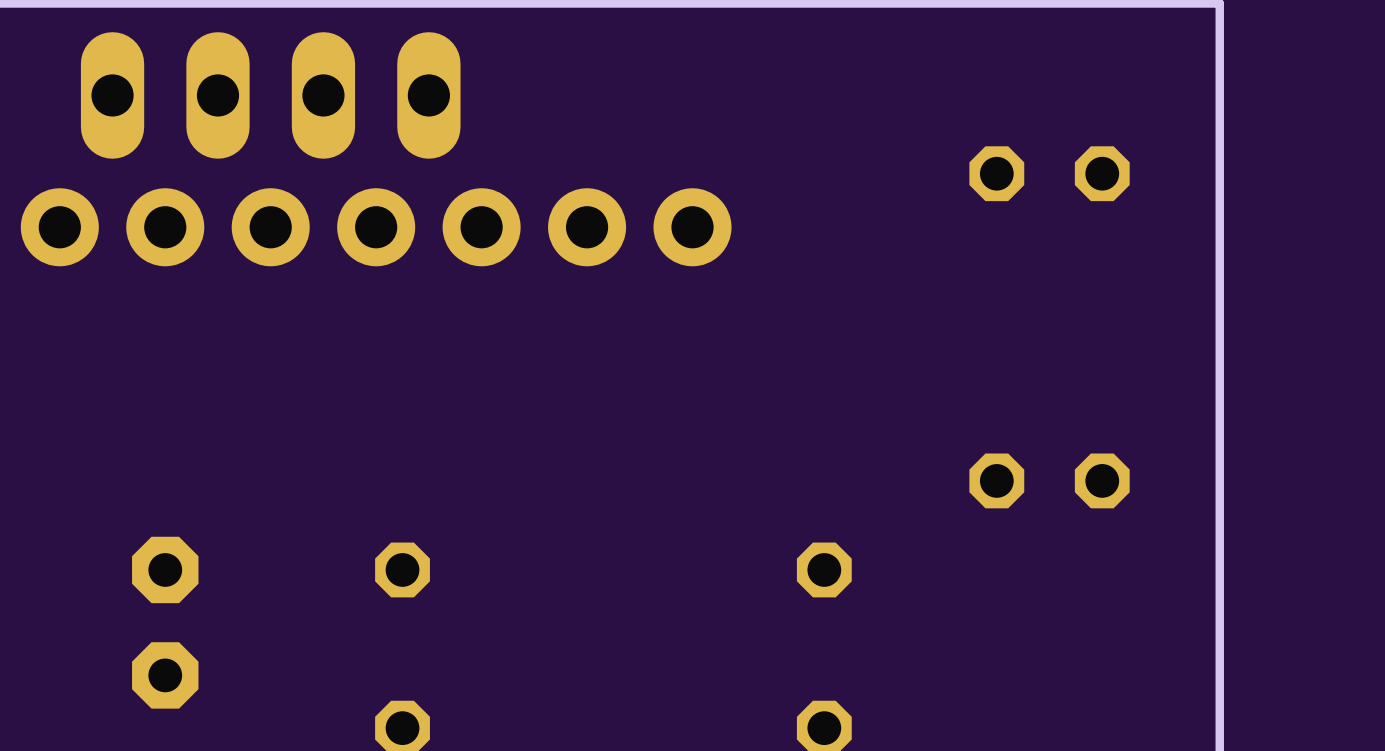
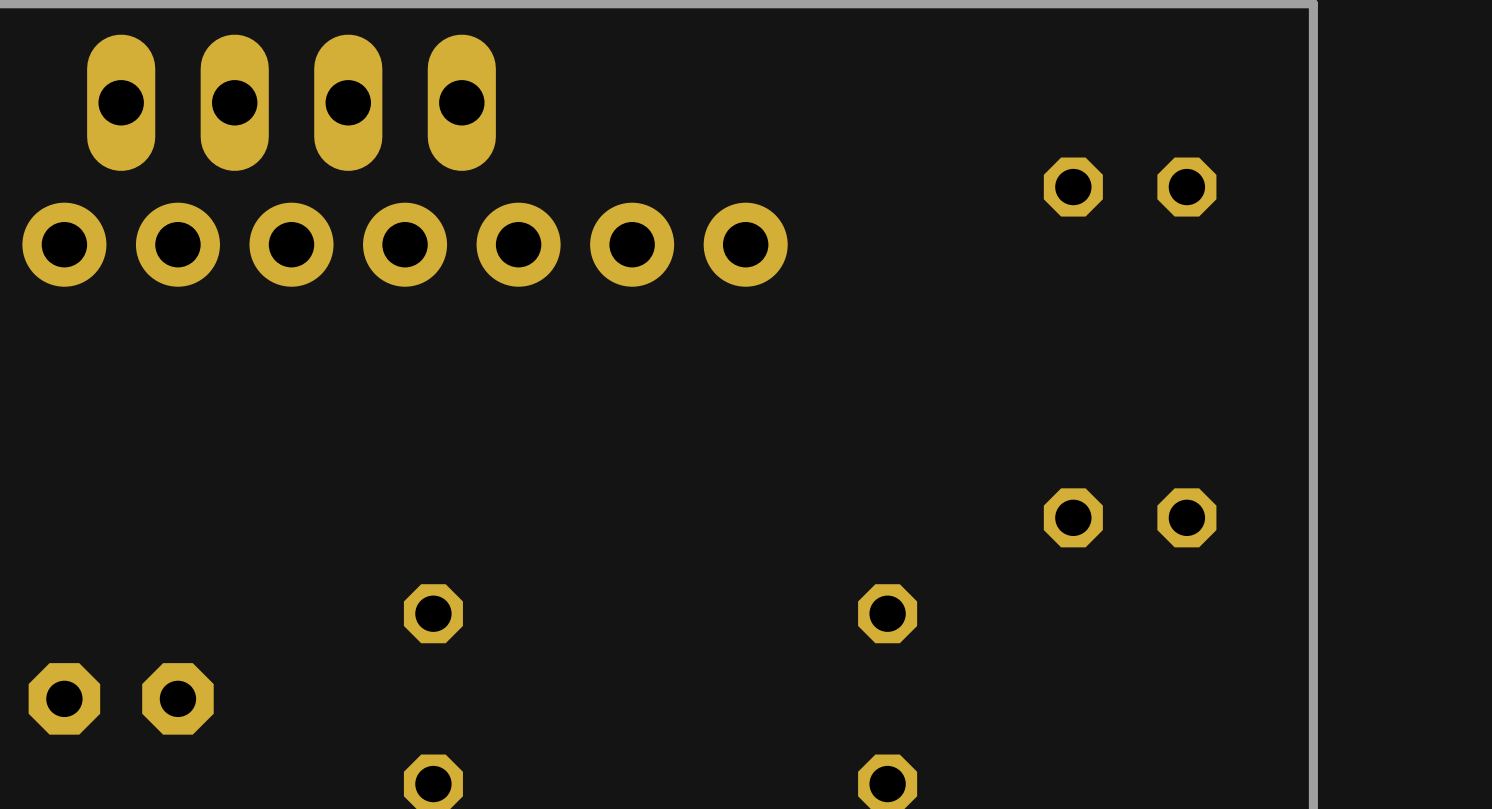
part rotation: 0° (165, 622) -> 90° clockwise (121, 698)

